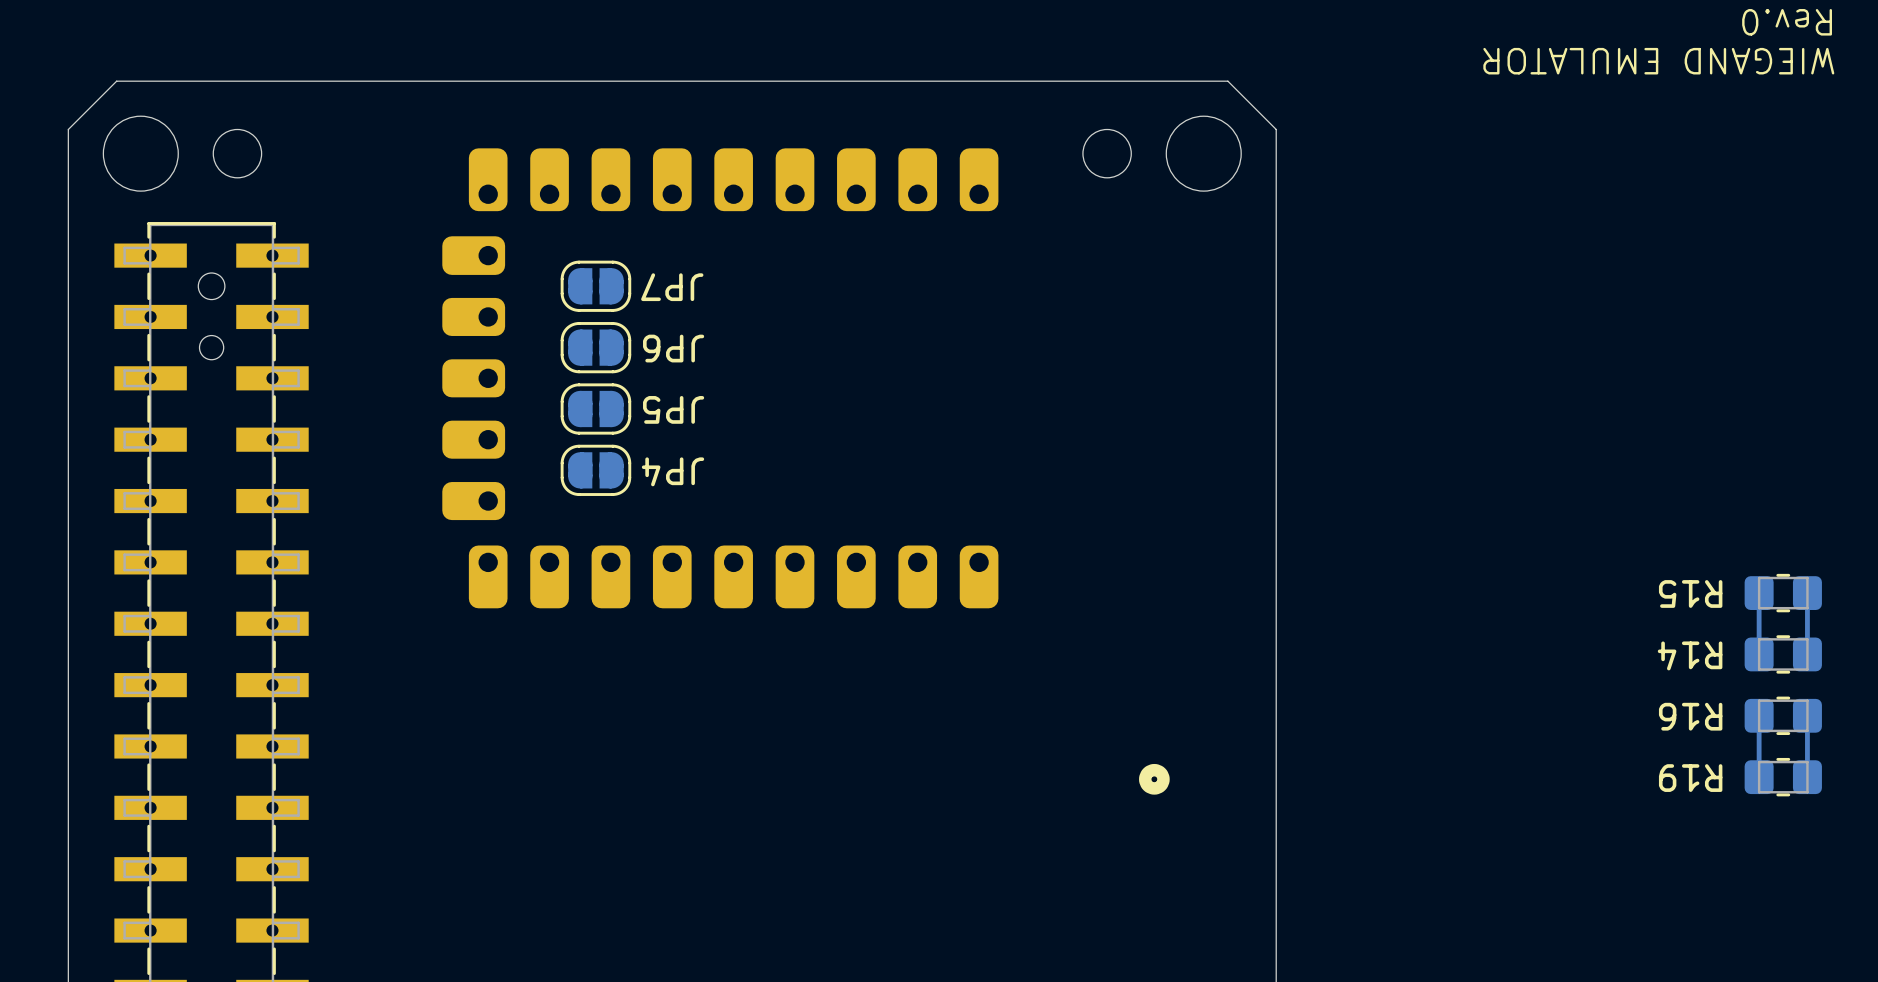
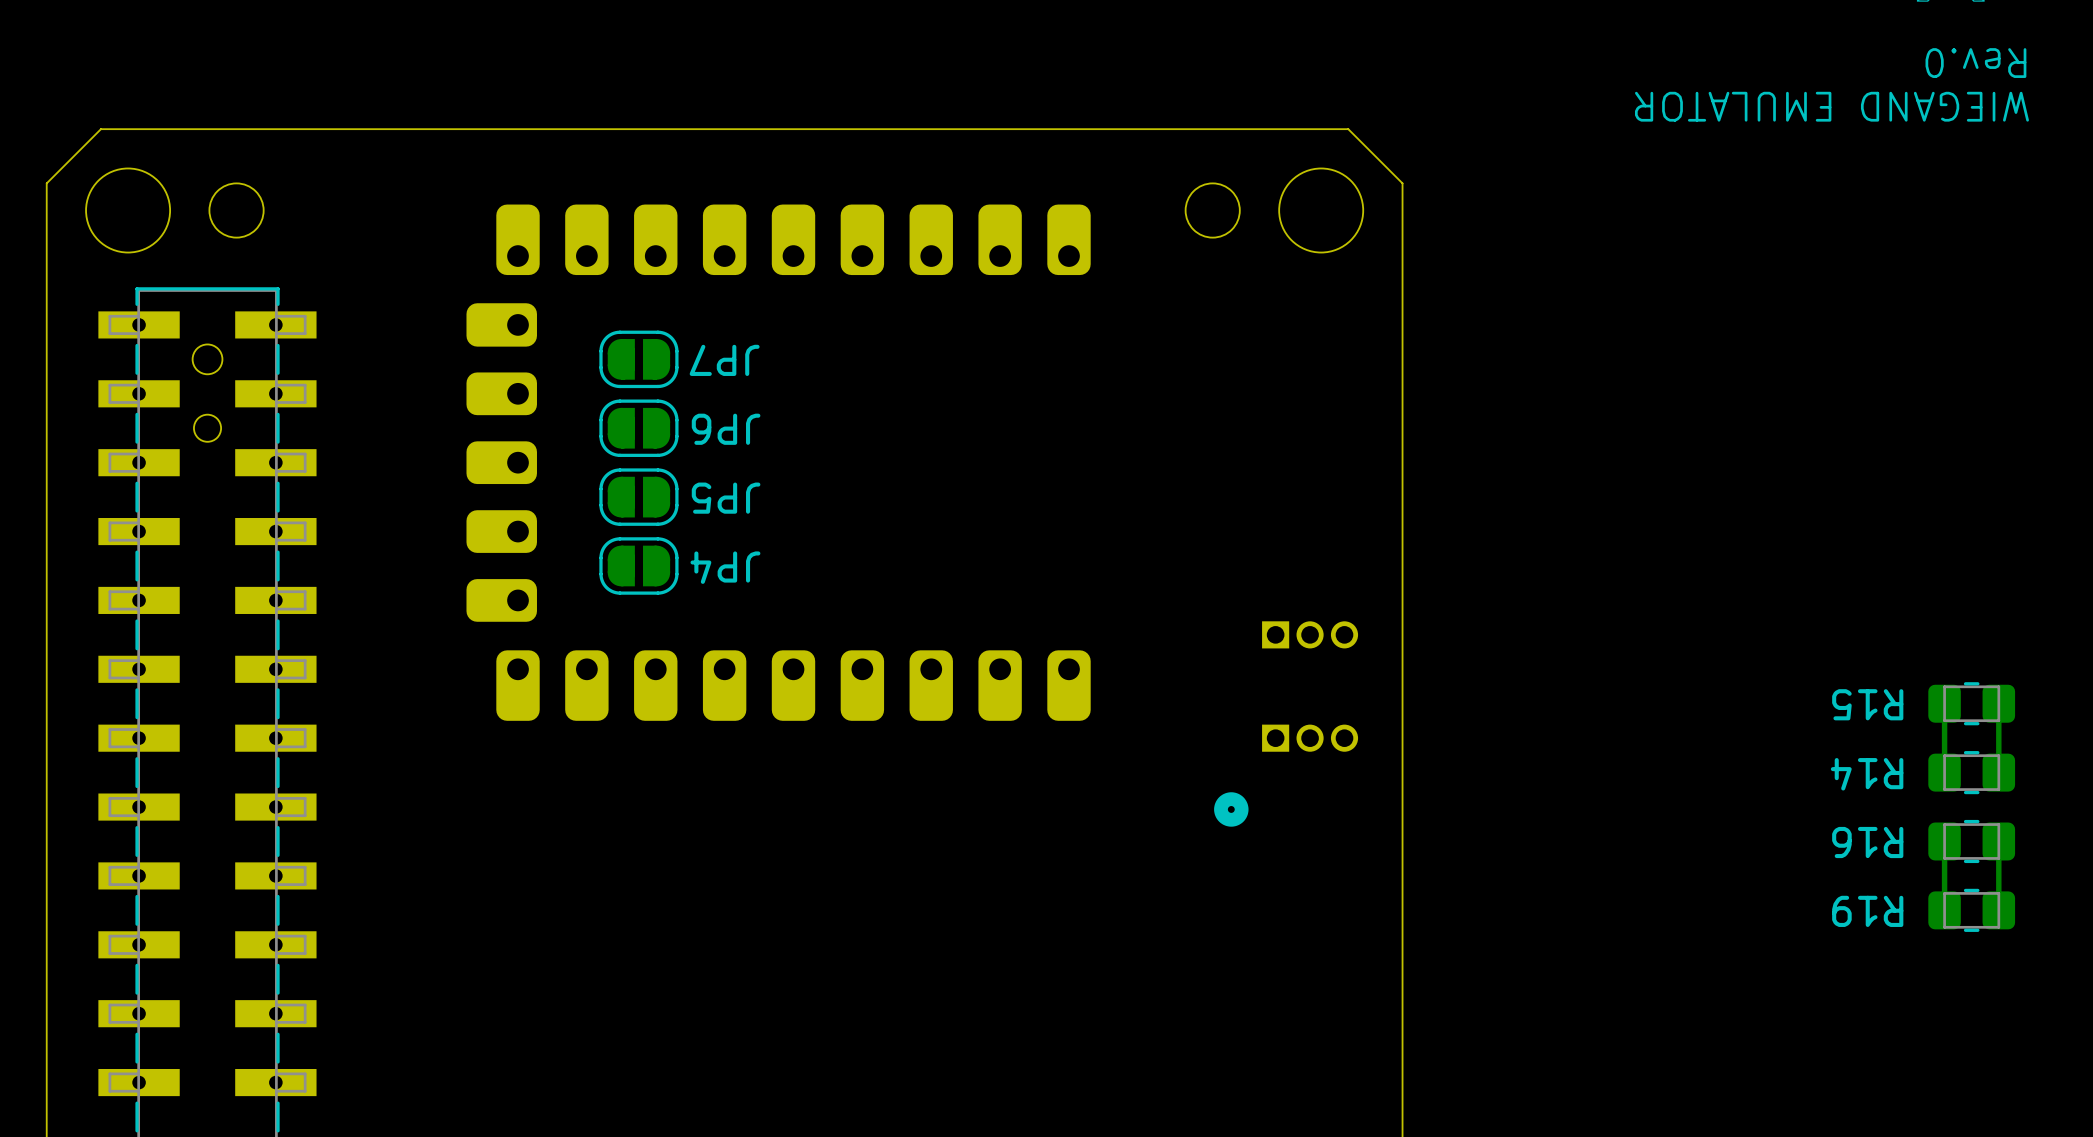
part: none -> (1310, 634)
part: none -> (1310, 738)
part position: (1154, 779) -> (1231, 809)

